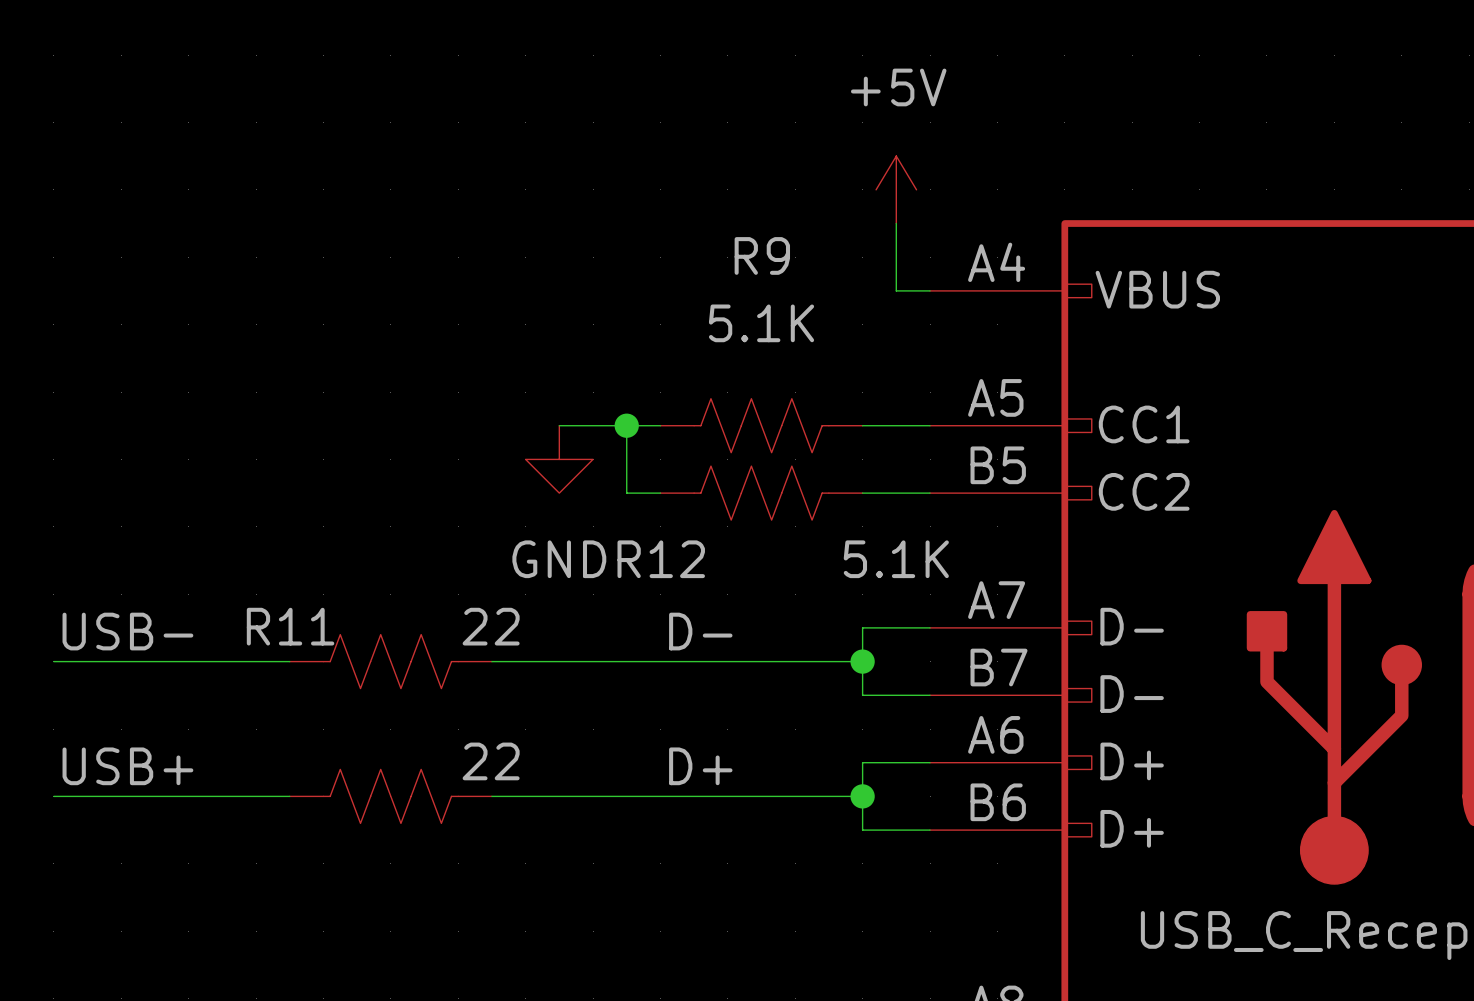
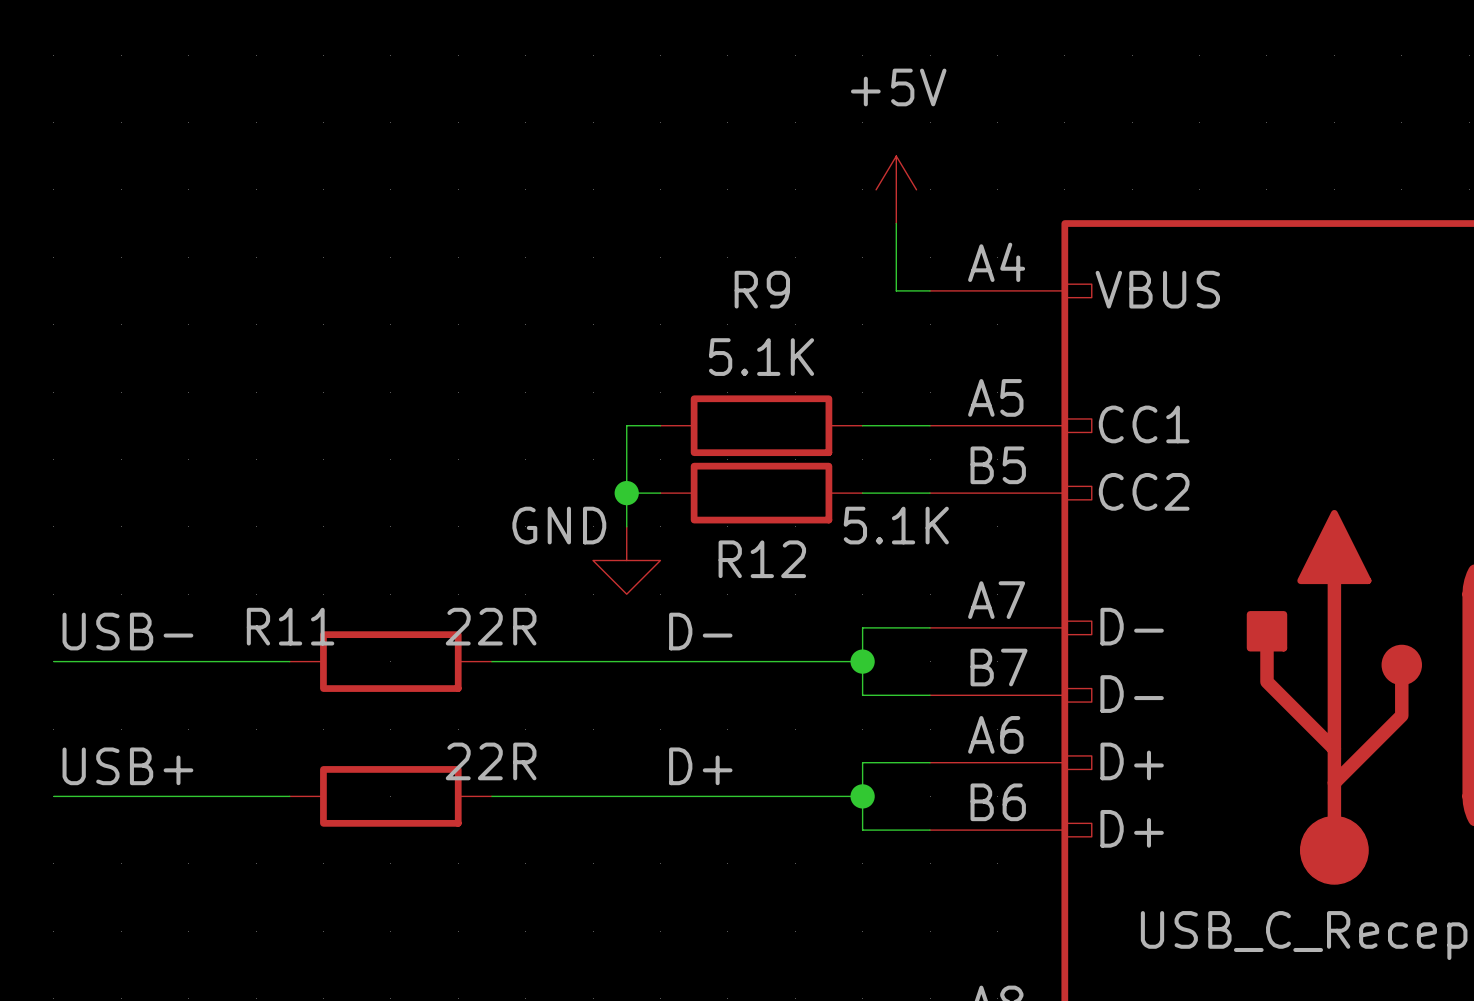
R9 symbol: [660, 398, 863, 453] -> [660, 395, 863, 457]
wire: (559, 425) (626, 425) -> none
junction position: (626, 425) -> (626, 493)
power symbol position: GND (559, 459) -> GND (626, 560)
R12 symbol: [660, 466, 863, 521] -> [660, 462, 863, 524]
wire: none -> (626, 493) (626, 526)
power symbol text position: GND (559, 559) -> GND (559, 525)
R12 name position: R12 (661, 559) -> R12 (762, 559)
R11 value: 22 (491, 626) -> 22R (491, 626)
R11 symbol: [289, 634, 492, 689] -> [289, 631, 492, 692]
part value: 22 (491, 761) -> 22R (491, 761)
part symbol: [289, 769, 492, 824] -> [289, 766, 492, 827]

